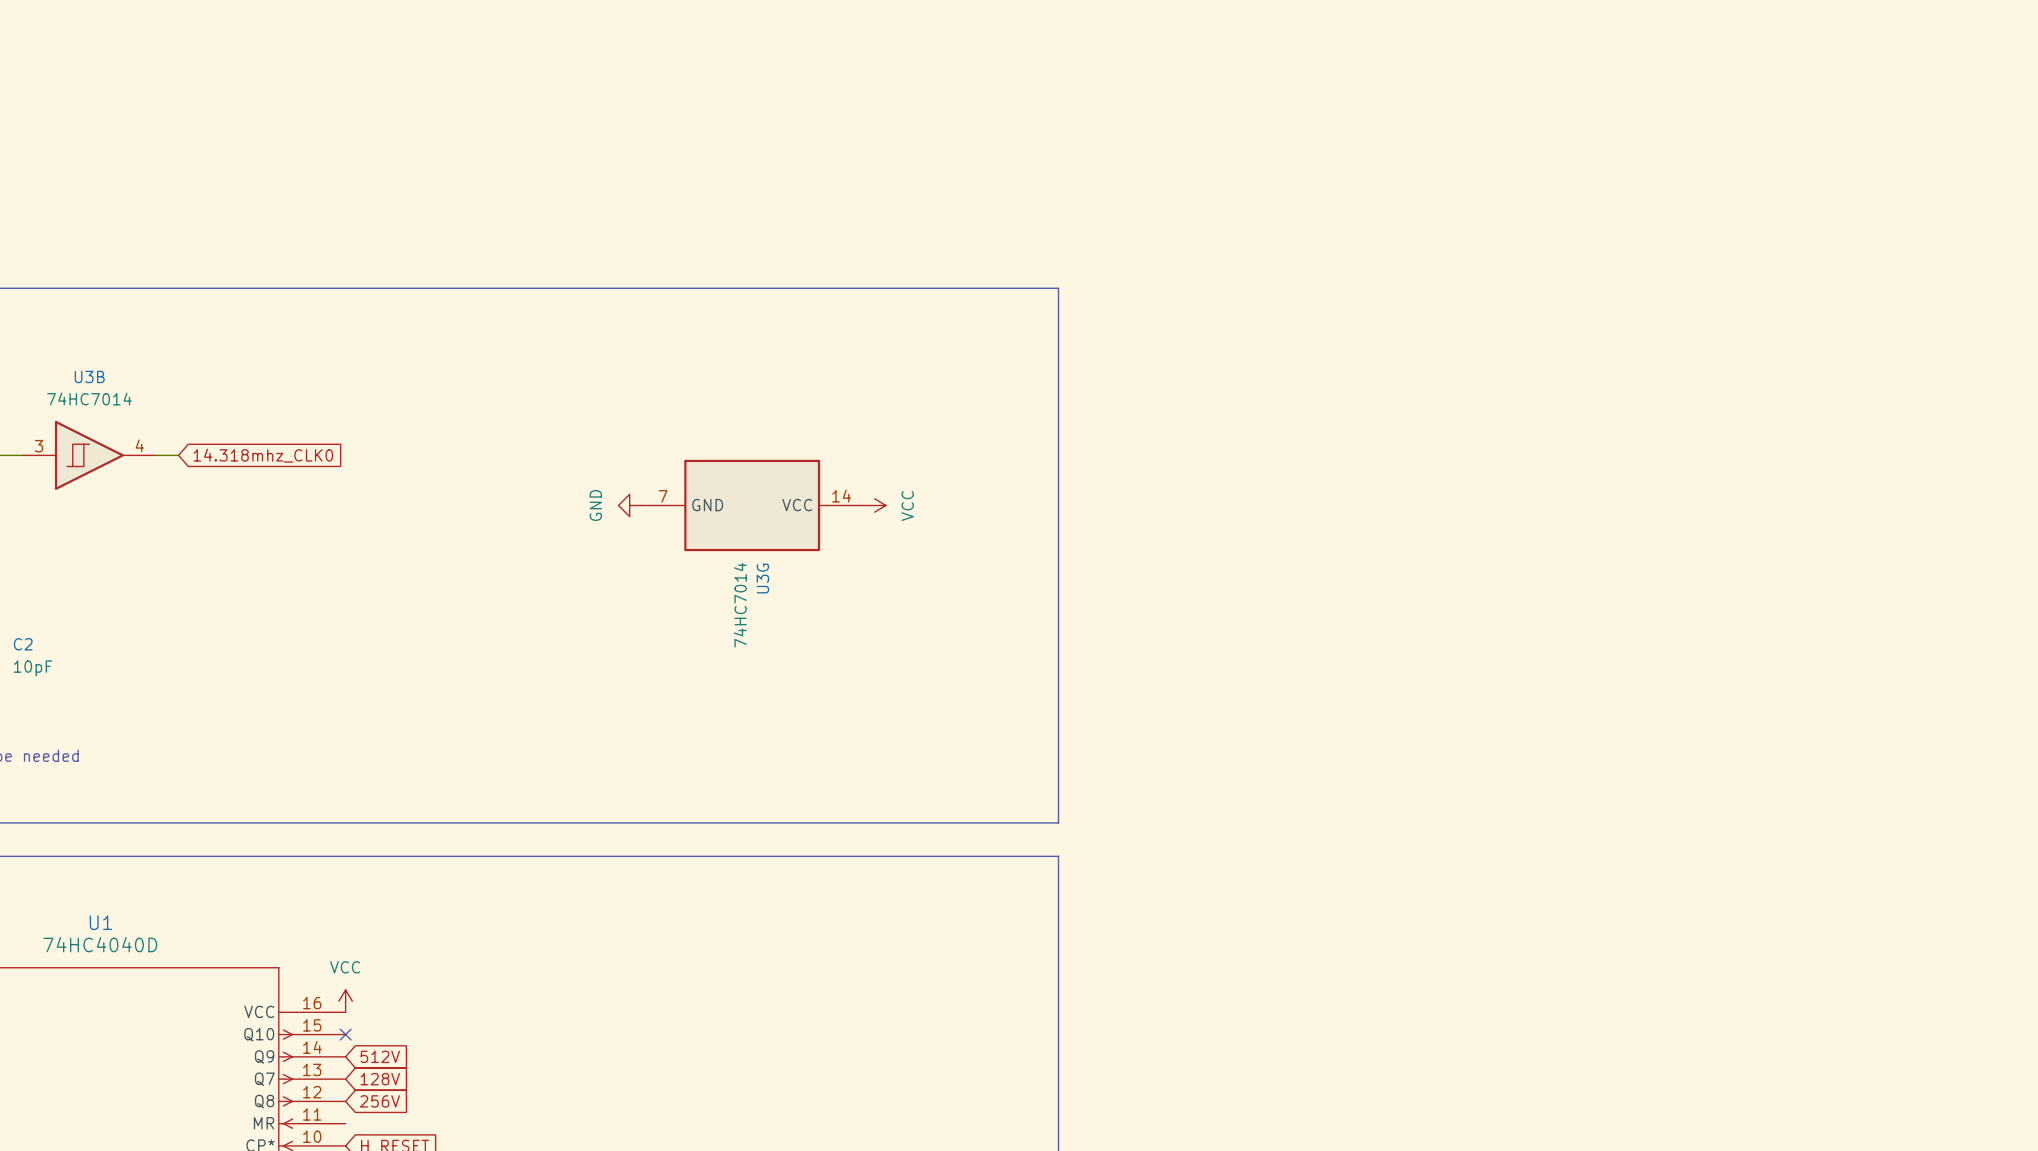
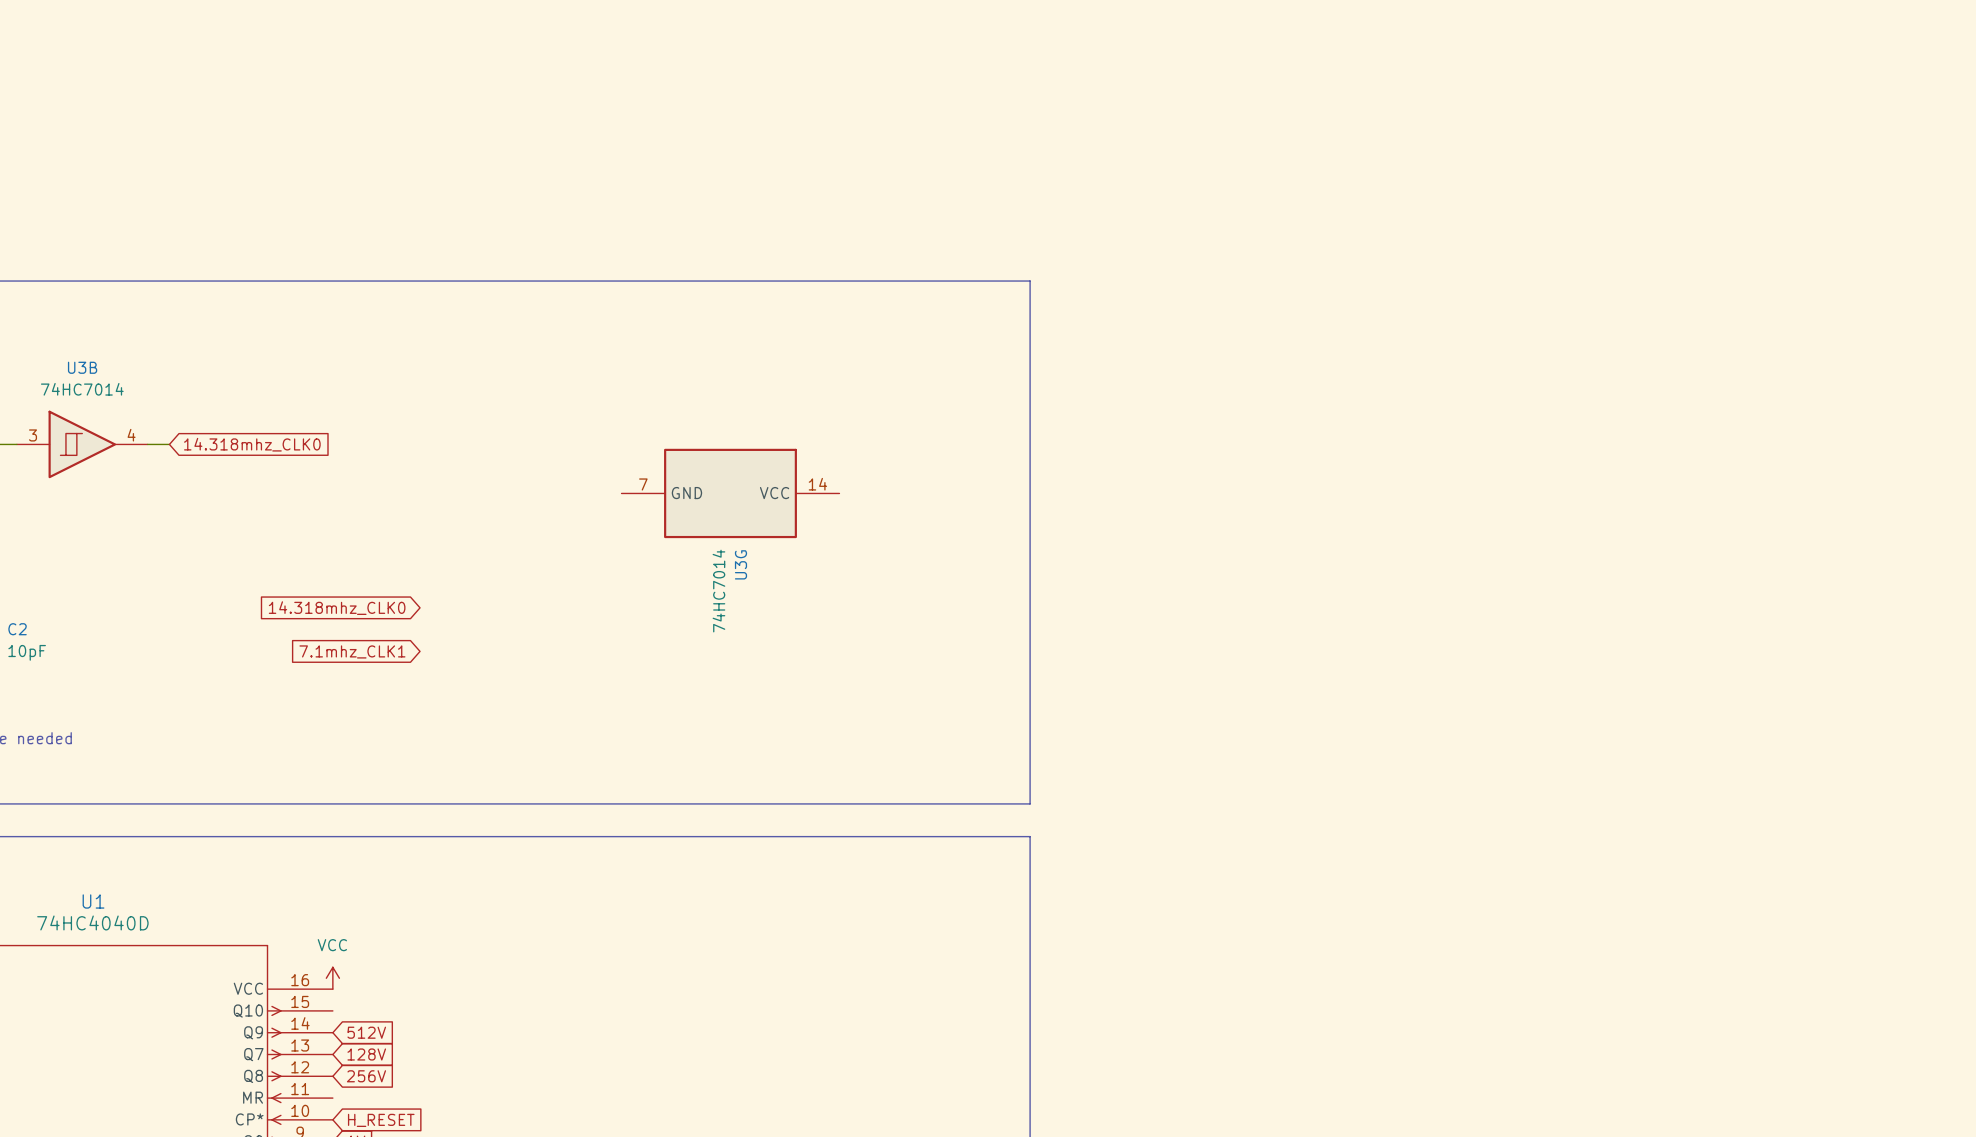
power symbol: GND (629, 505) -> none
power symbol: VCC (874, 505) -> none
global label: none -> 14.318mhz_CLK0 (337, 608)
global label: none -> 7.1mhz_CLK1 (352, 651)
no-connect mark: (345, 1034) -> none

